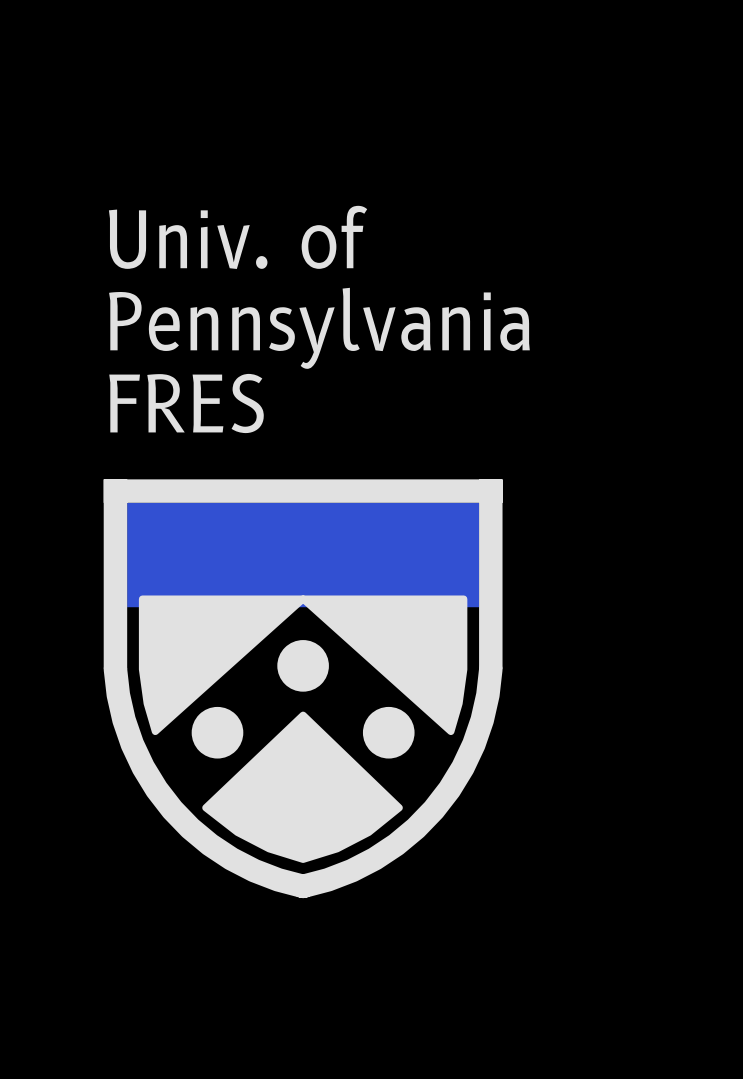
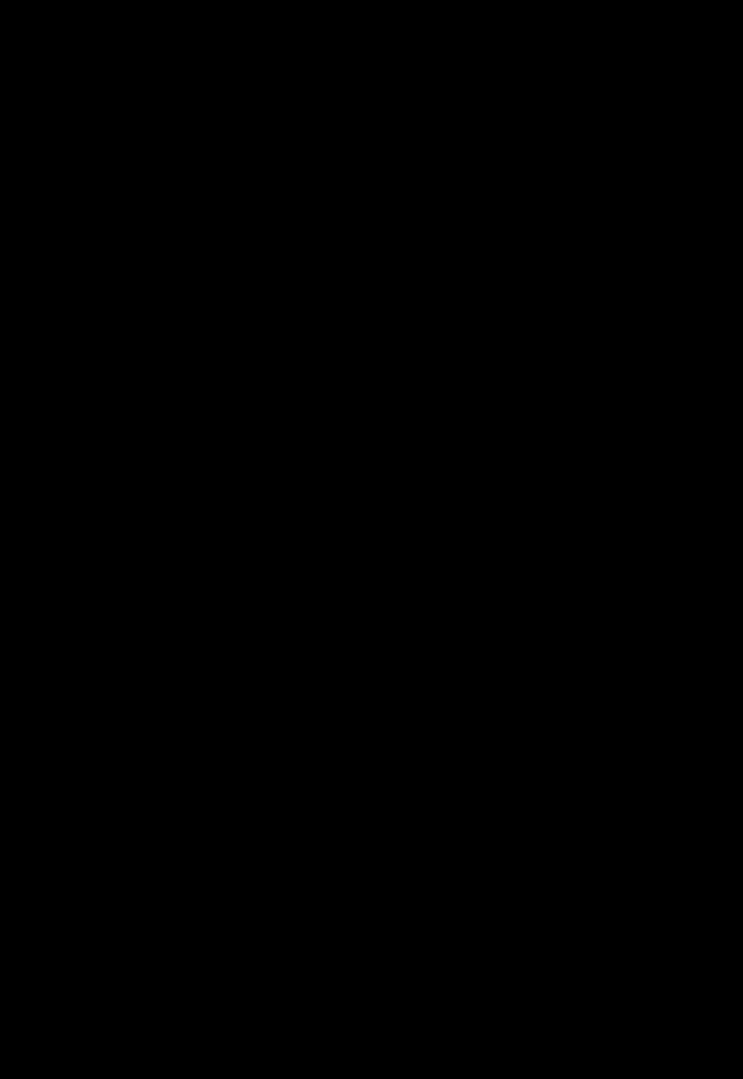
text: Univ. of (238, 237) -> none
text: Pennsylvania (319, 328) -> none
text: FRES (186, 403) -> none
drawing: [103, 479, 503, 899] -> none

